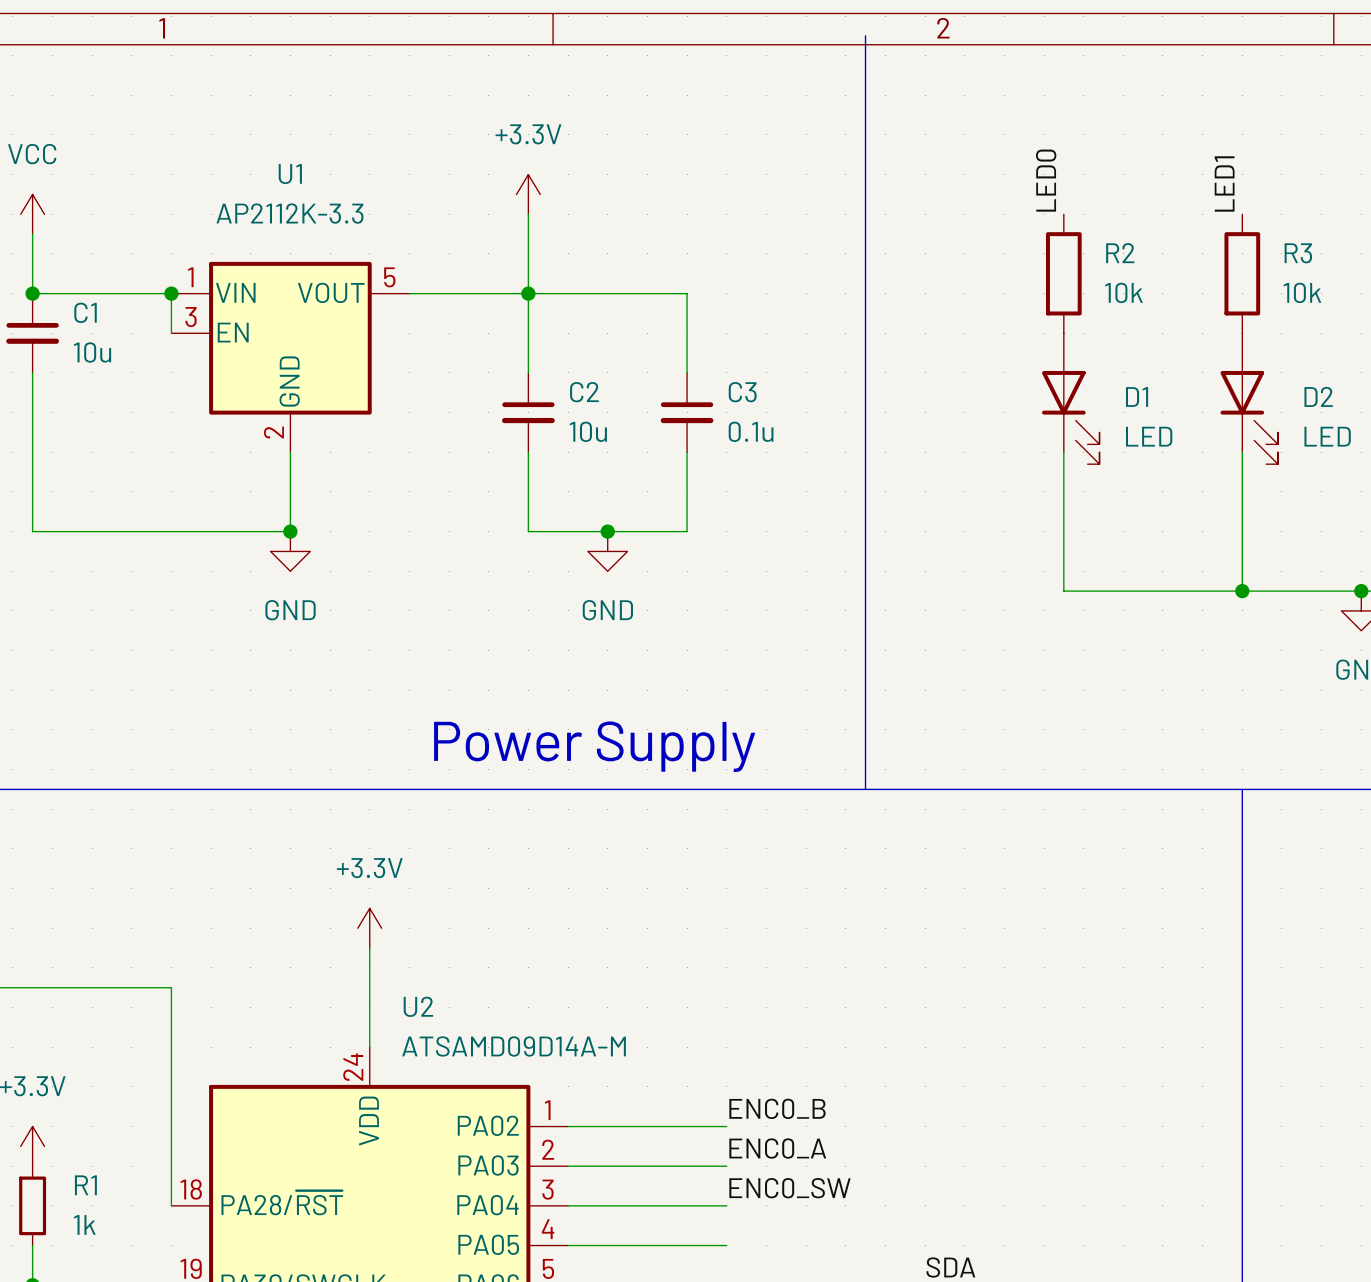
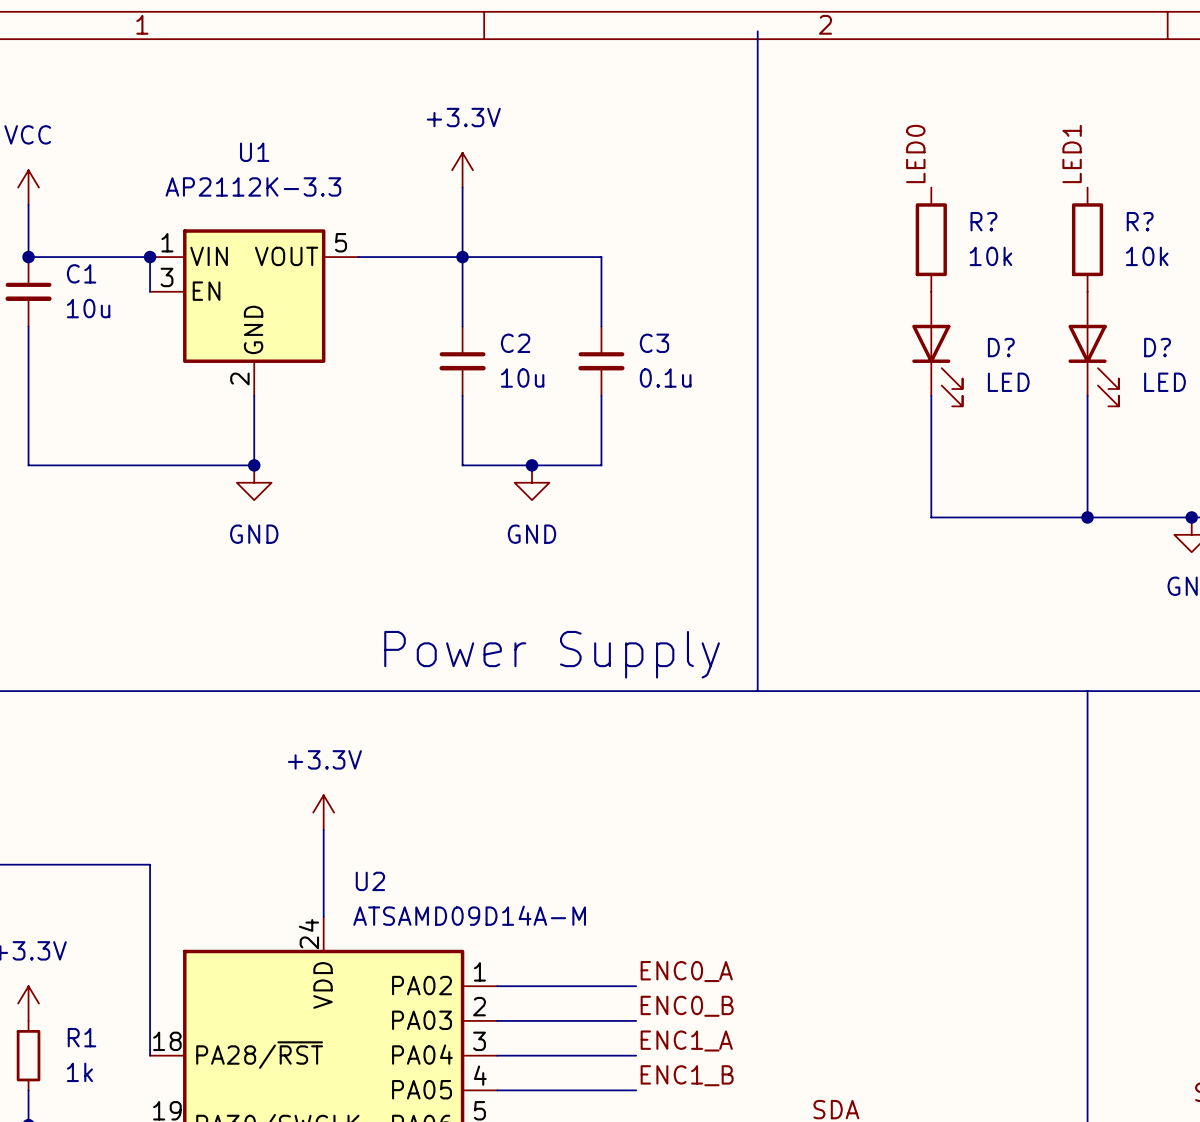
R2 name: R2 (1120, 253) -> R? (983, 221)
R3 name: R3 (1298, 253) -> R? (1140, 221)
D2 name: D2 (1318, 396) -> D? (1157, 347)
D1 name: D1 (1137, 397) -> D? (1001, 347)
label: ENC0_B (777, 1108) -> ENC0_A (686, 971)
label: ENC0_A (777, 1148) -> ENC0_B (687, 1006)
label: ENC0_SW (789, 1188) -> ENC1_A (686, 1040)
label: none -> ENC1_B (687, 1075)

